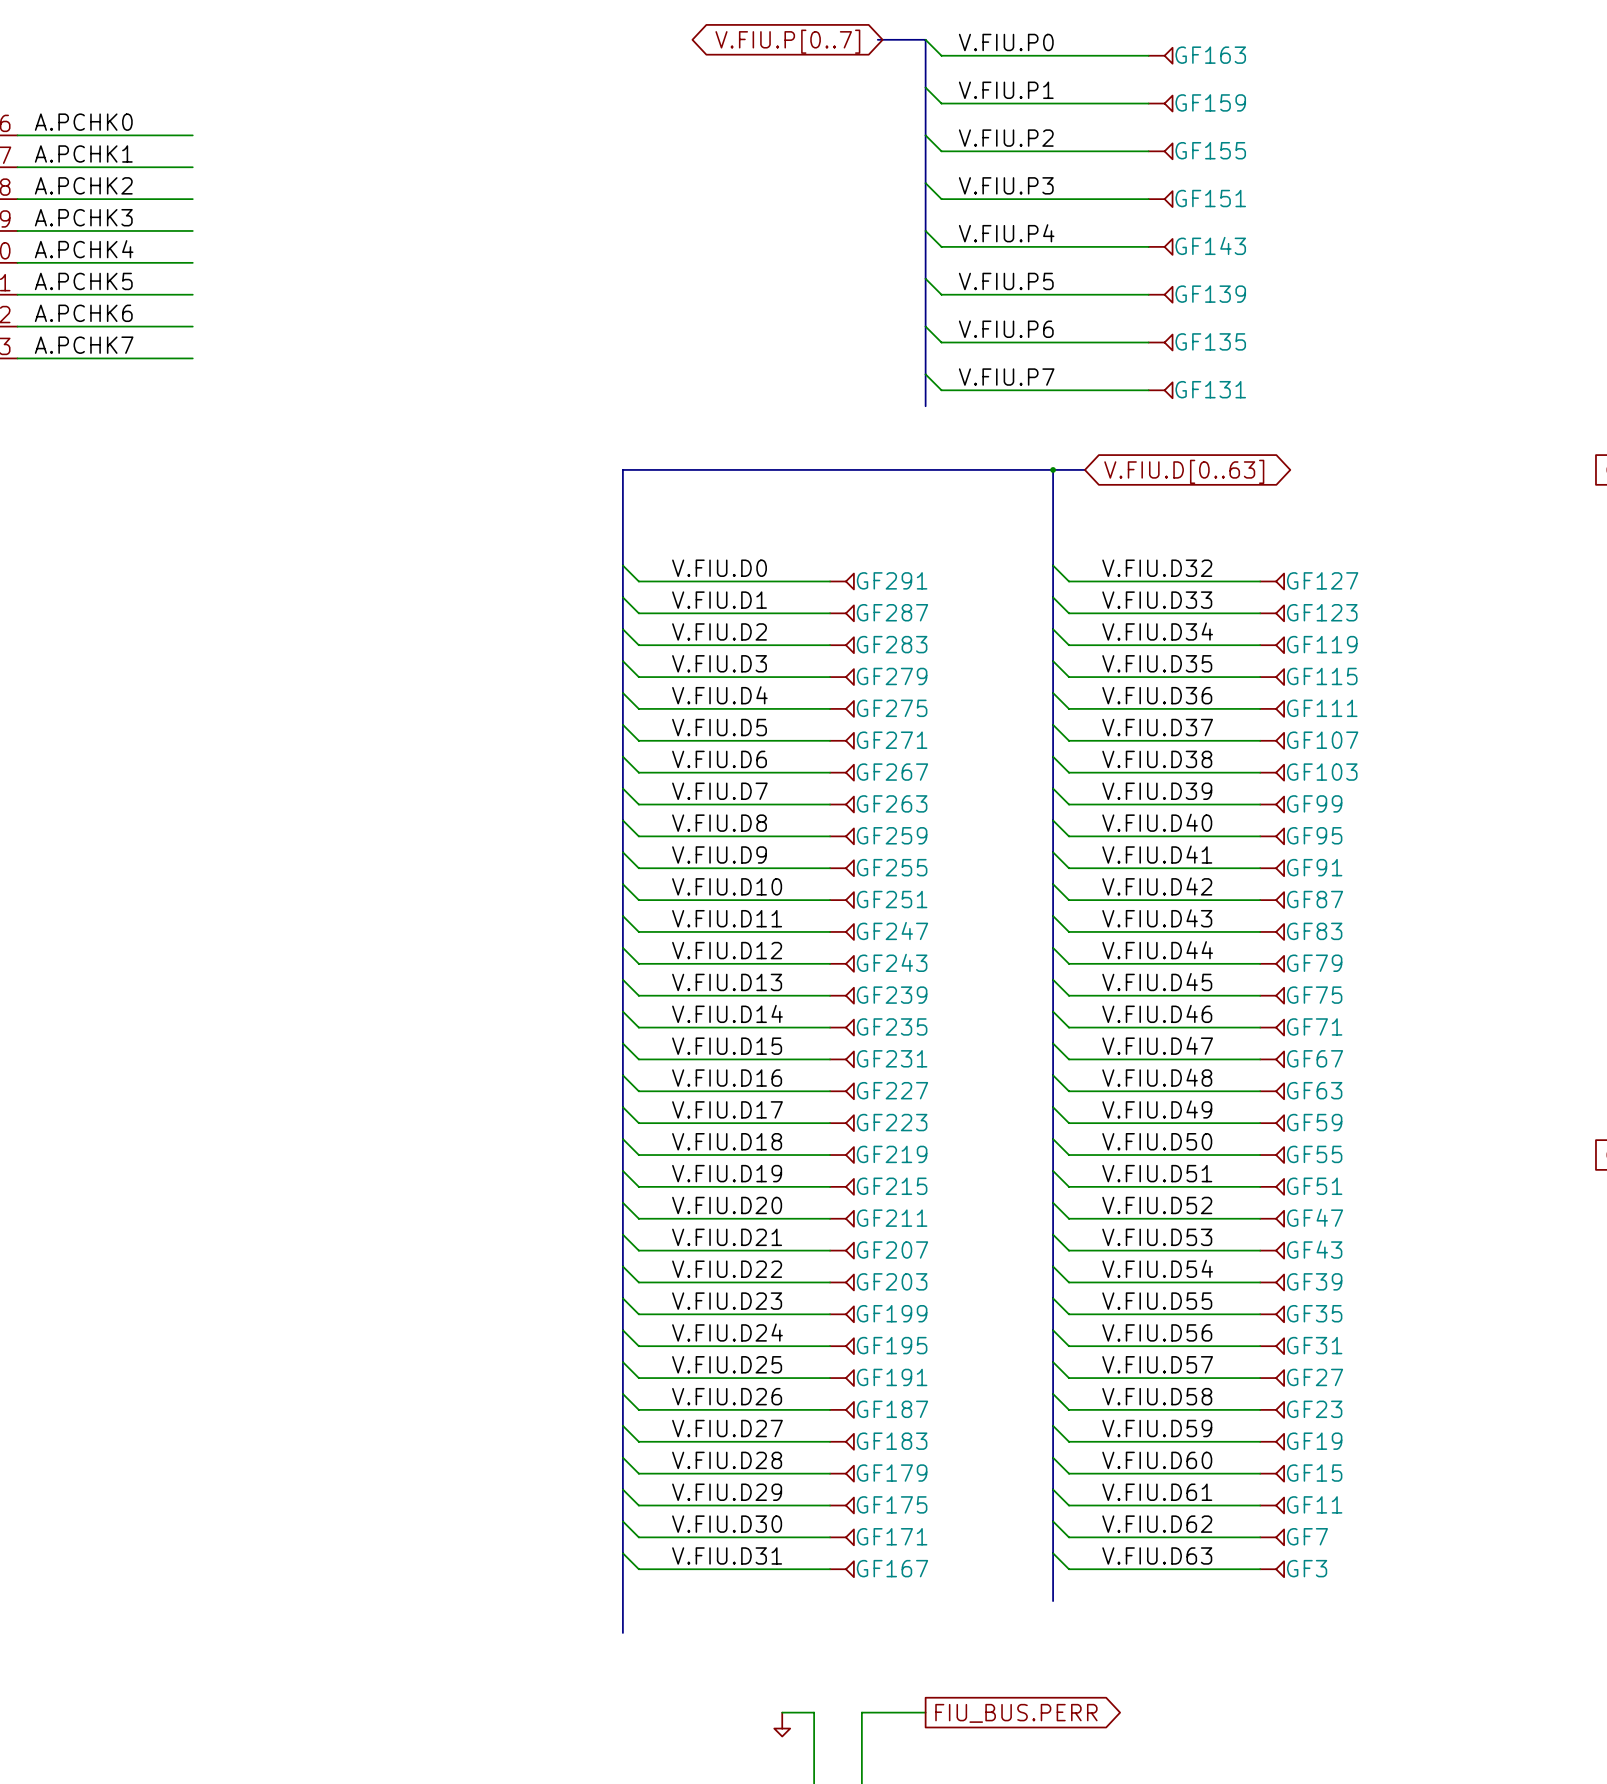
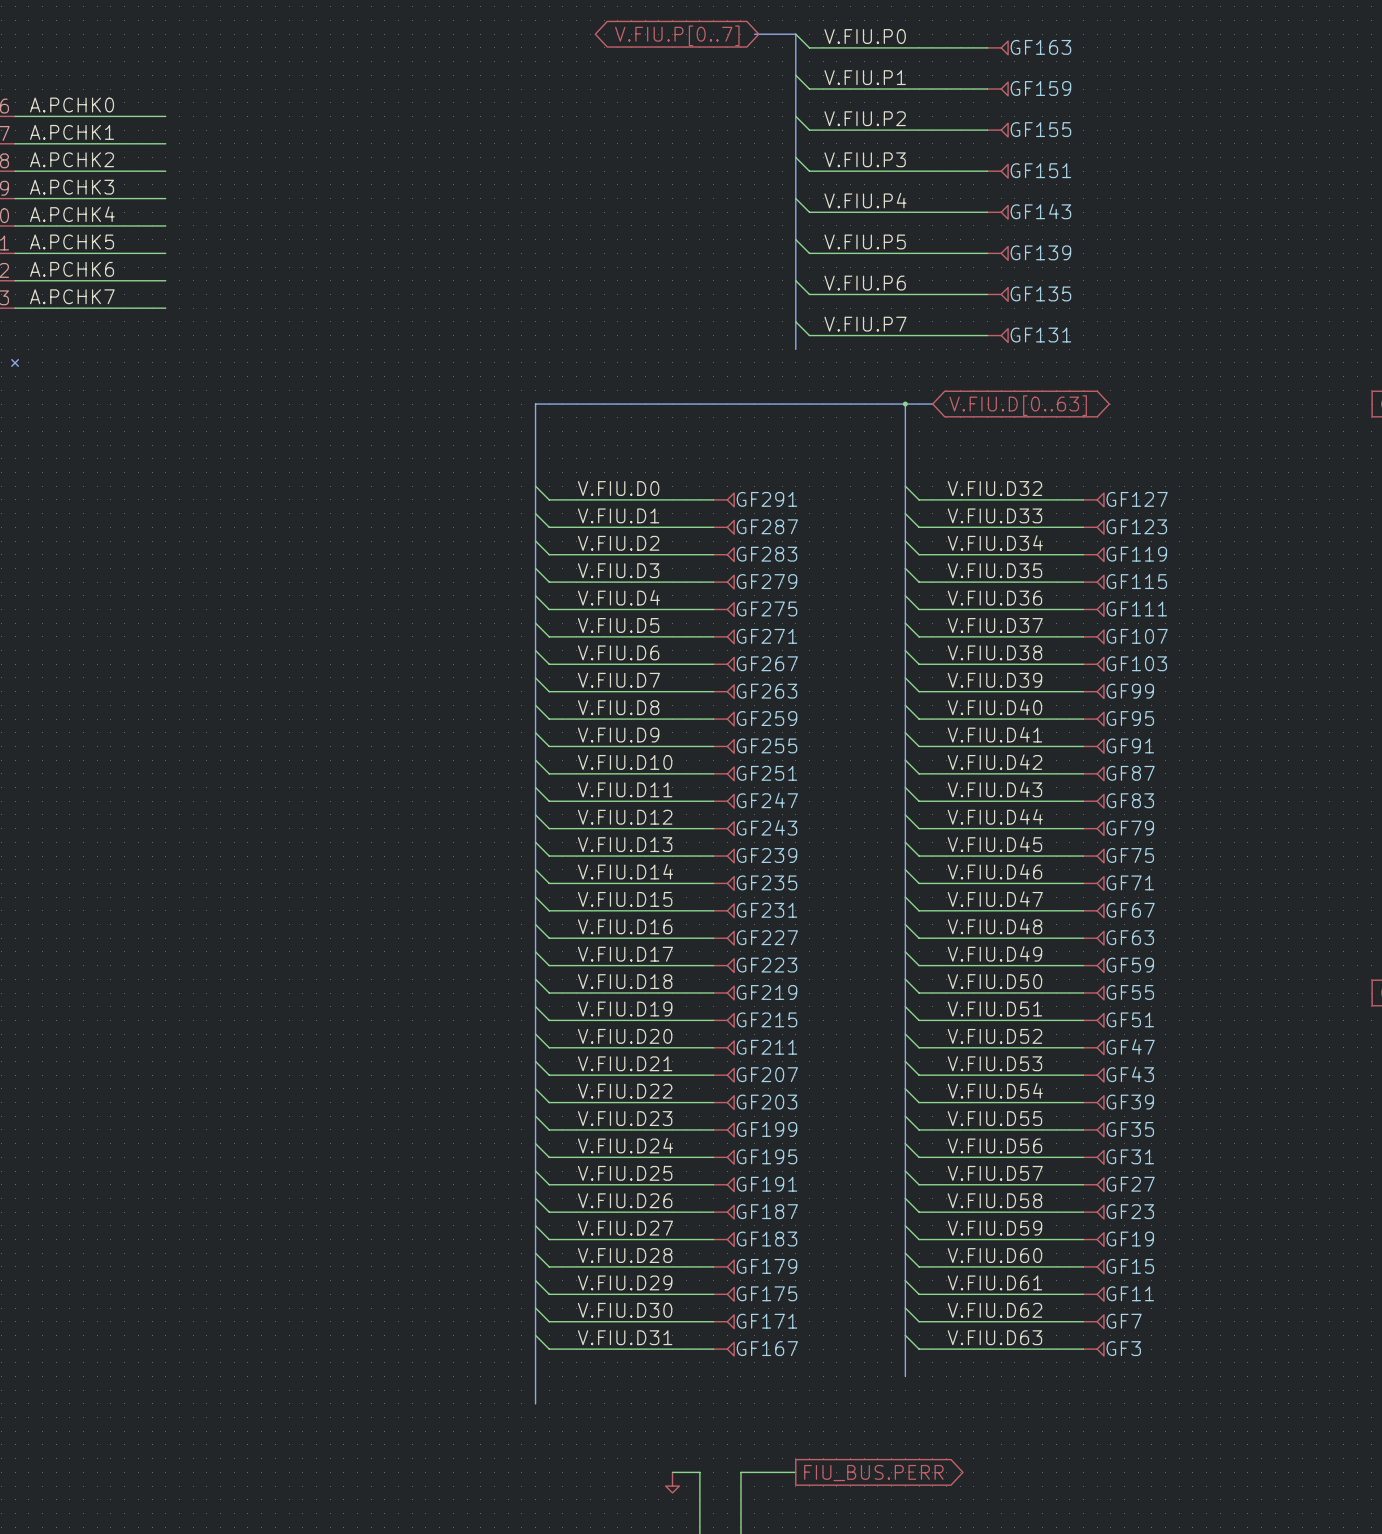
no-connect mark: none -> (15, 362)

